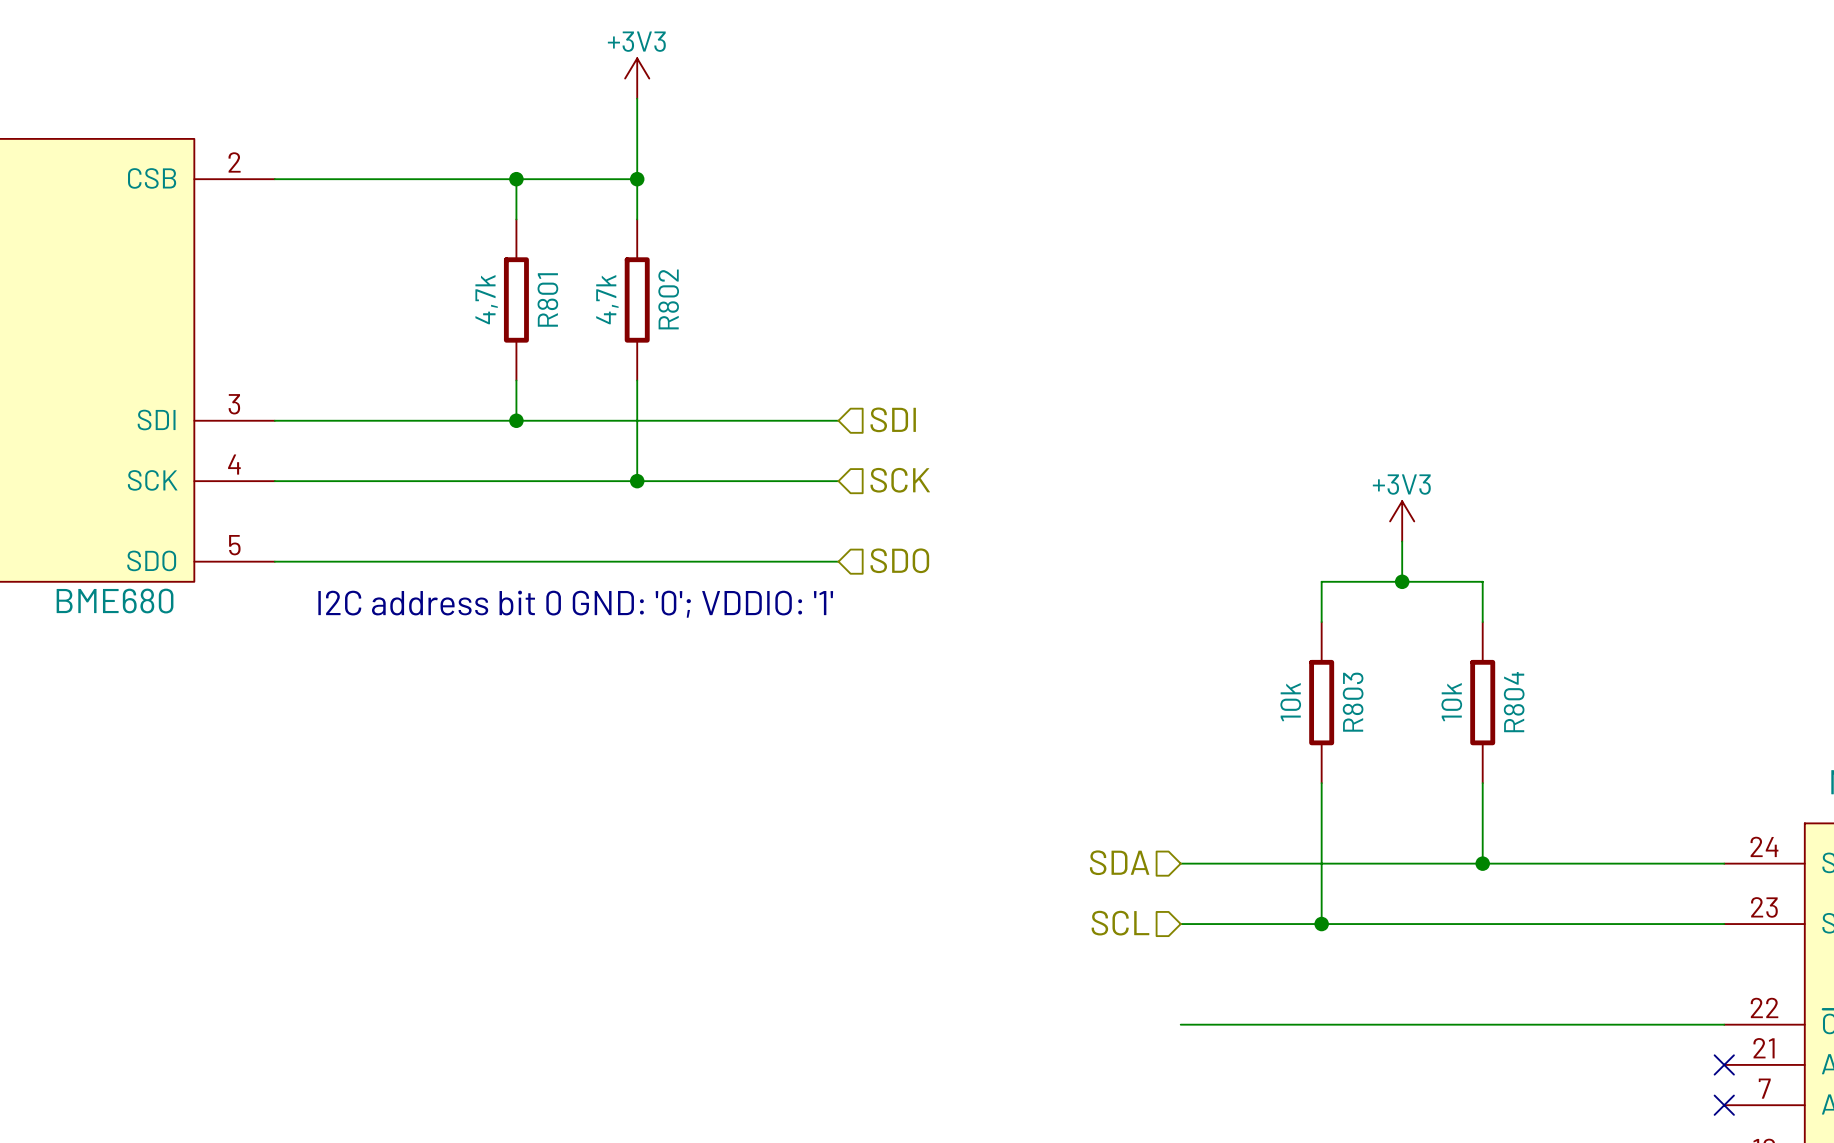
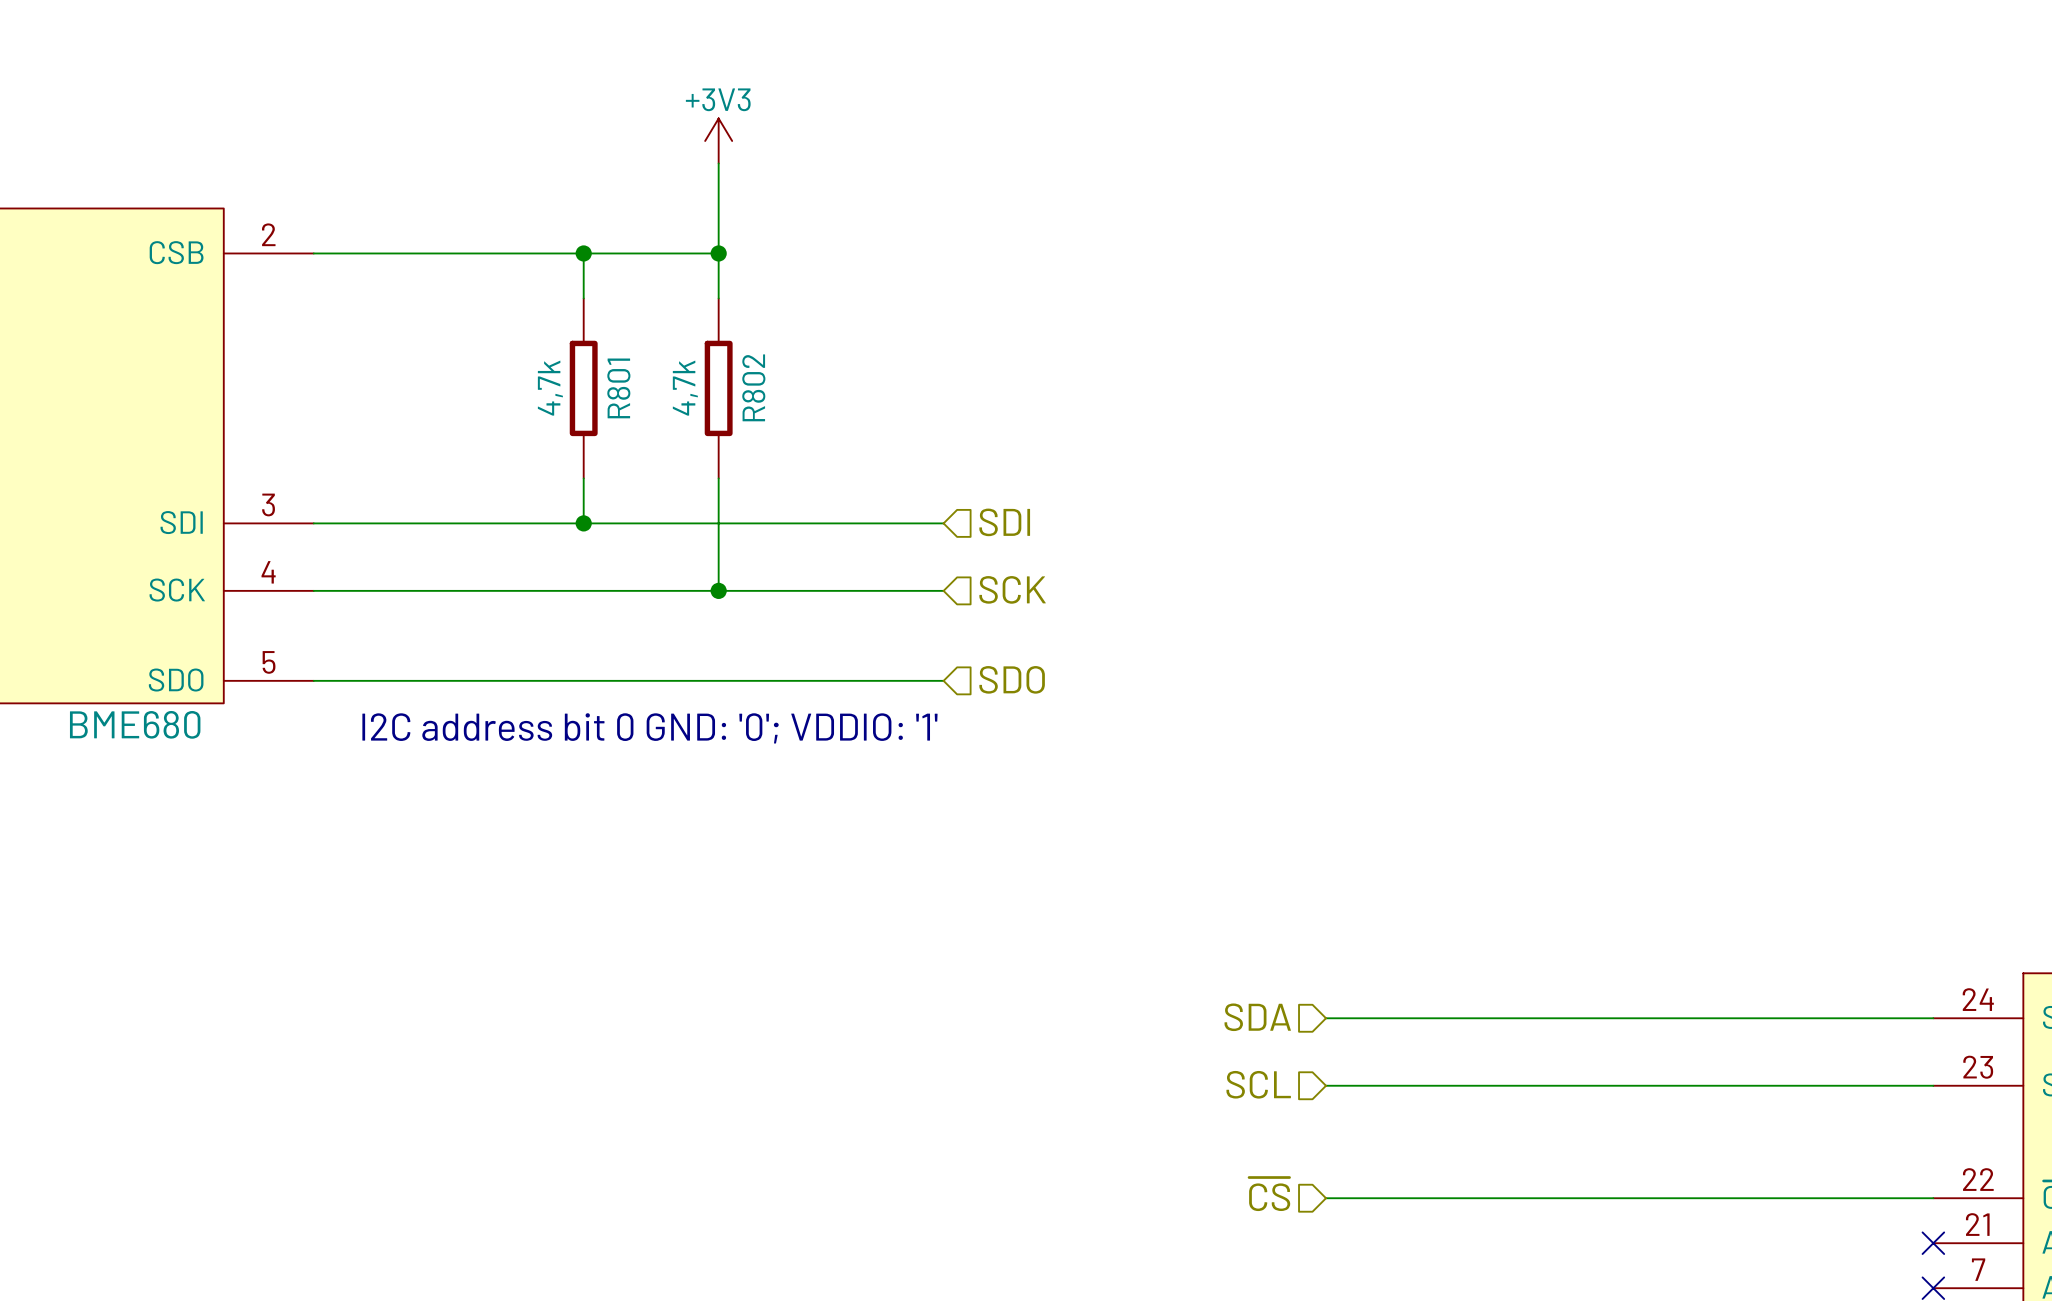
power symbol: +3V3 (1402, 521) -> none
wire: (1402, 541) (1402, 581) -> none
junction: (1402, 581) -> none
wire: (1321, 622) (1321, 581) (1482, 581) (1482, 622) -> none
R803: 10k (1321, 702) -> none
R804: 10k (1482, 702) -> none
wire: (1321, 783) (1321, 924) -> none
wire: (1482, 783) (1482, 863) -> none
junction: (1482, 863) -> none
junction: (1321, 924) -> none
hierarchical label: none -> ~{CS} (1269, 1194)

